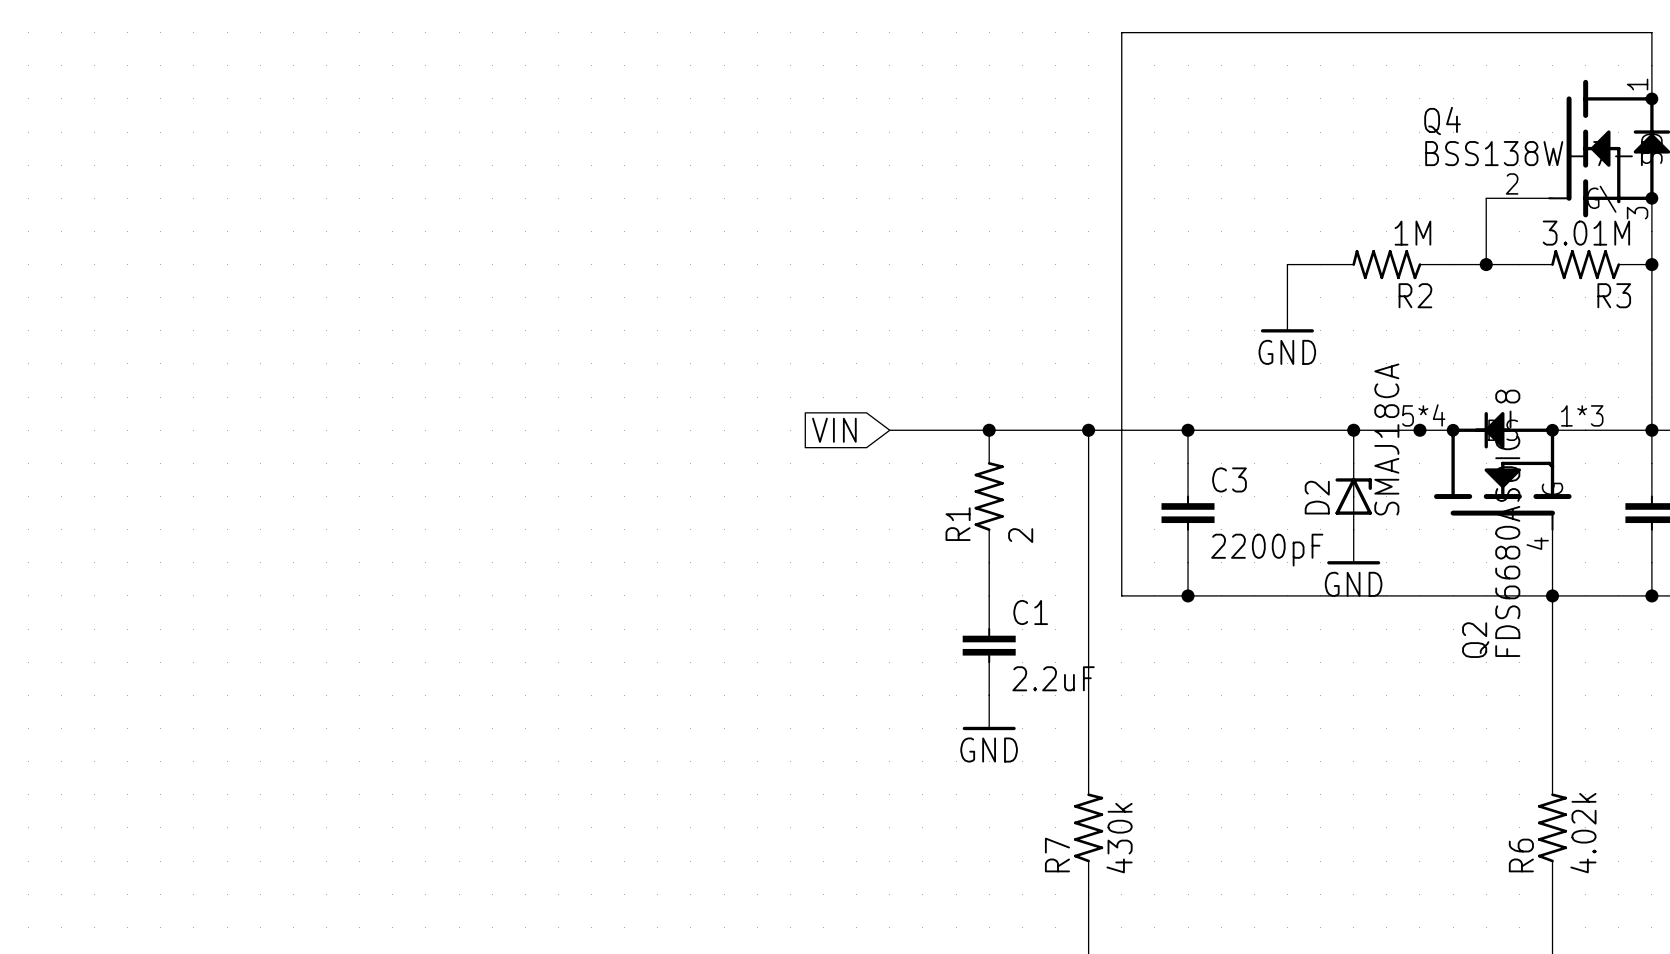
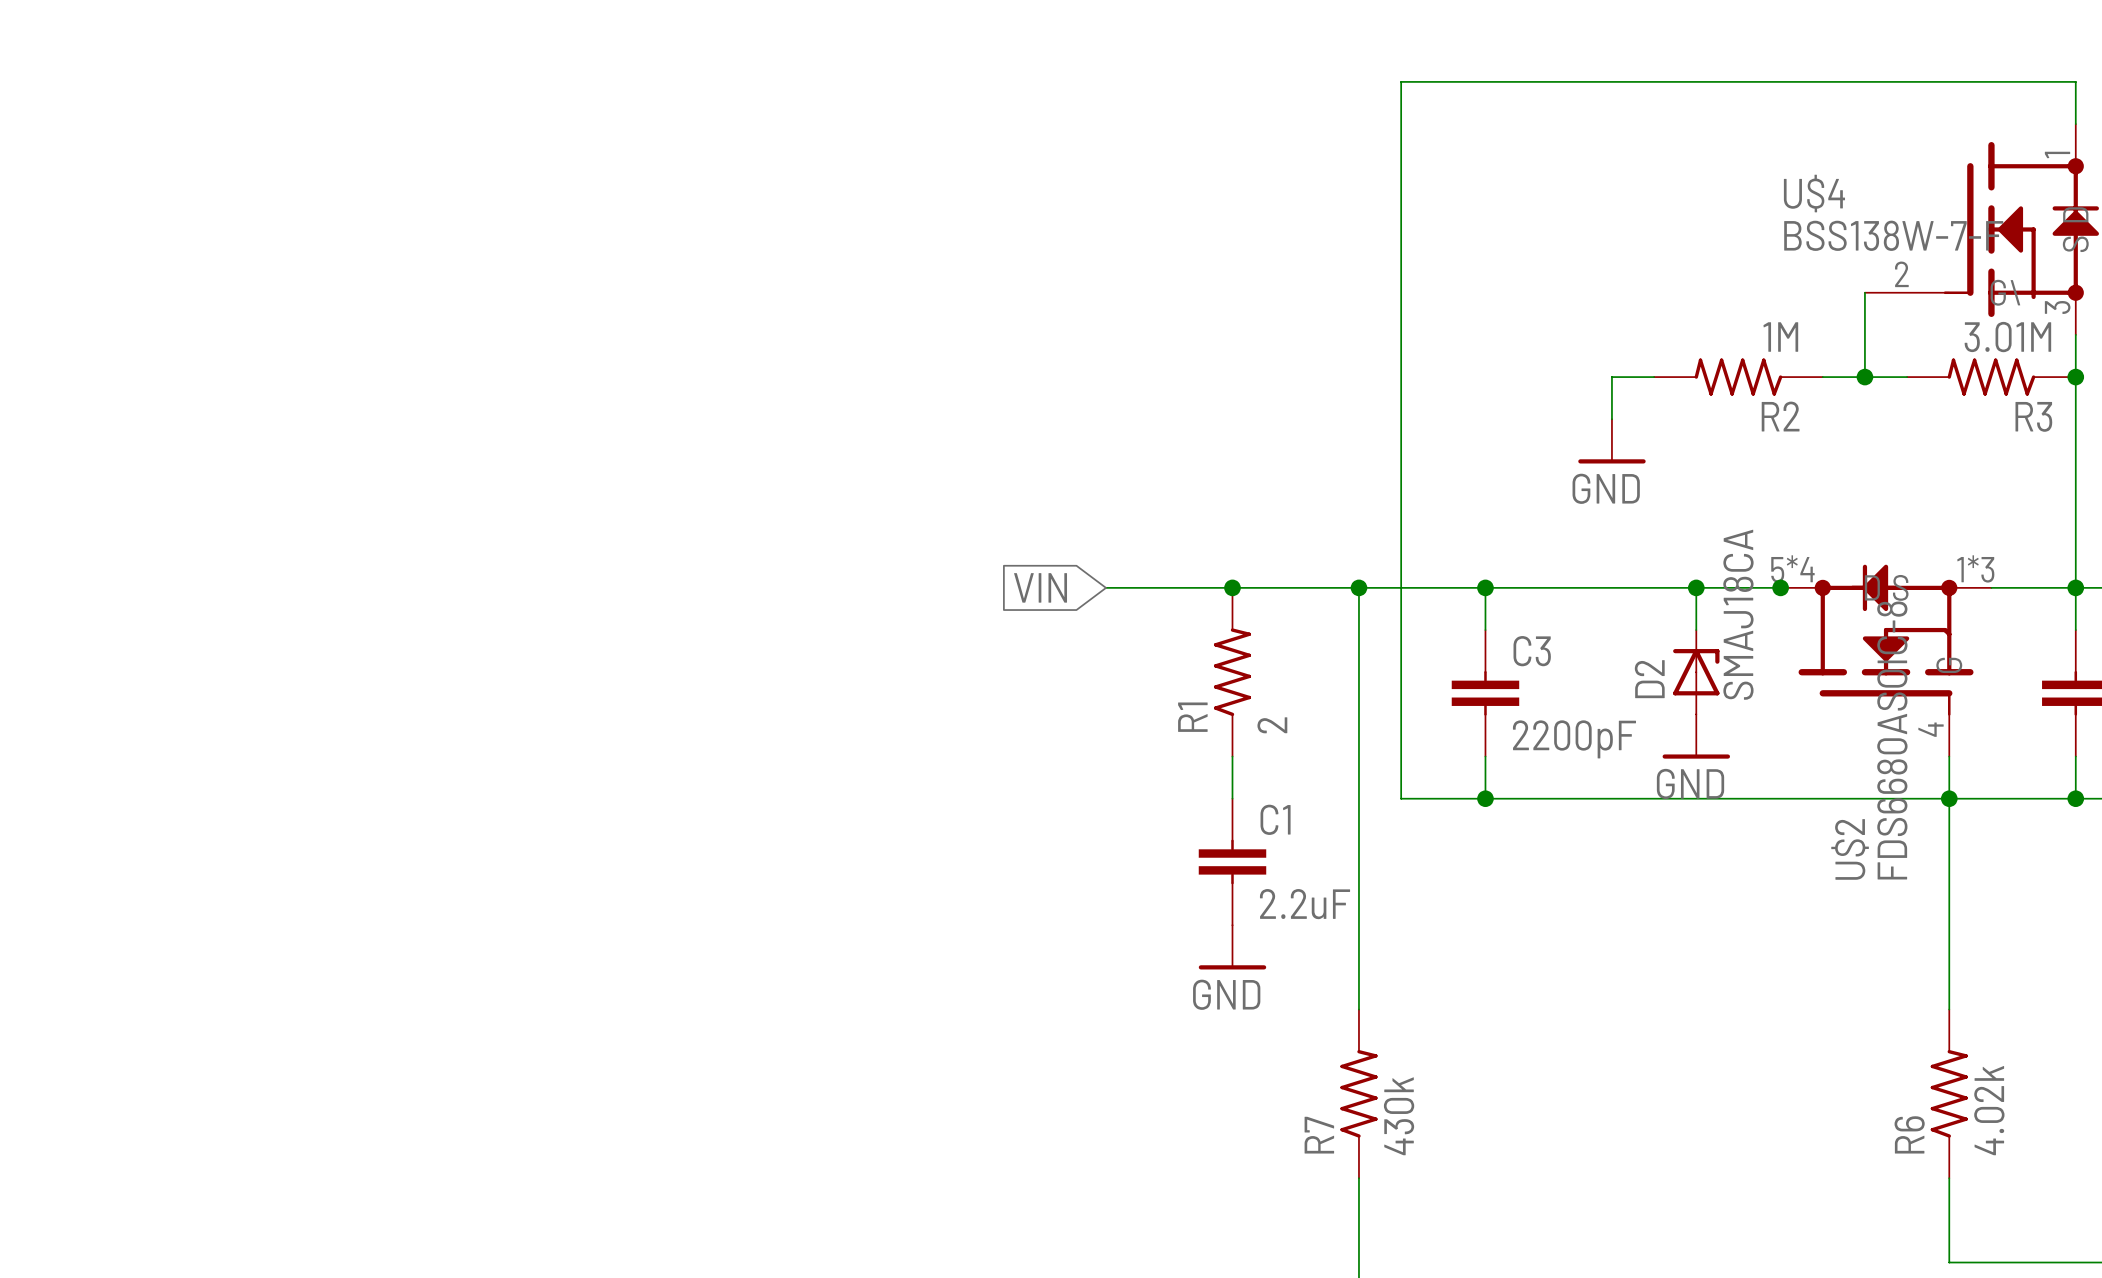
Q4 name: Q4 (1442, 120) -> U$4 (1814, 193)
Q2 name: Q2 (1475, 640) -> U$2 (1850, 849)

